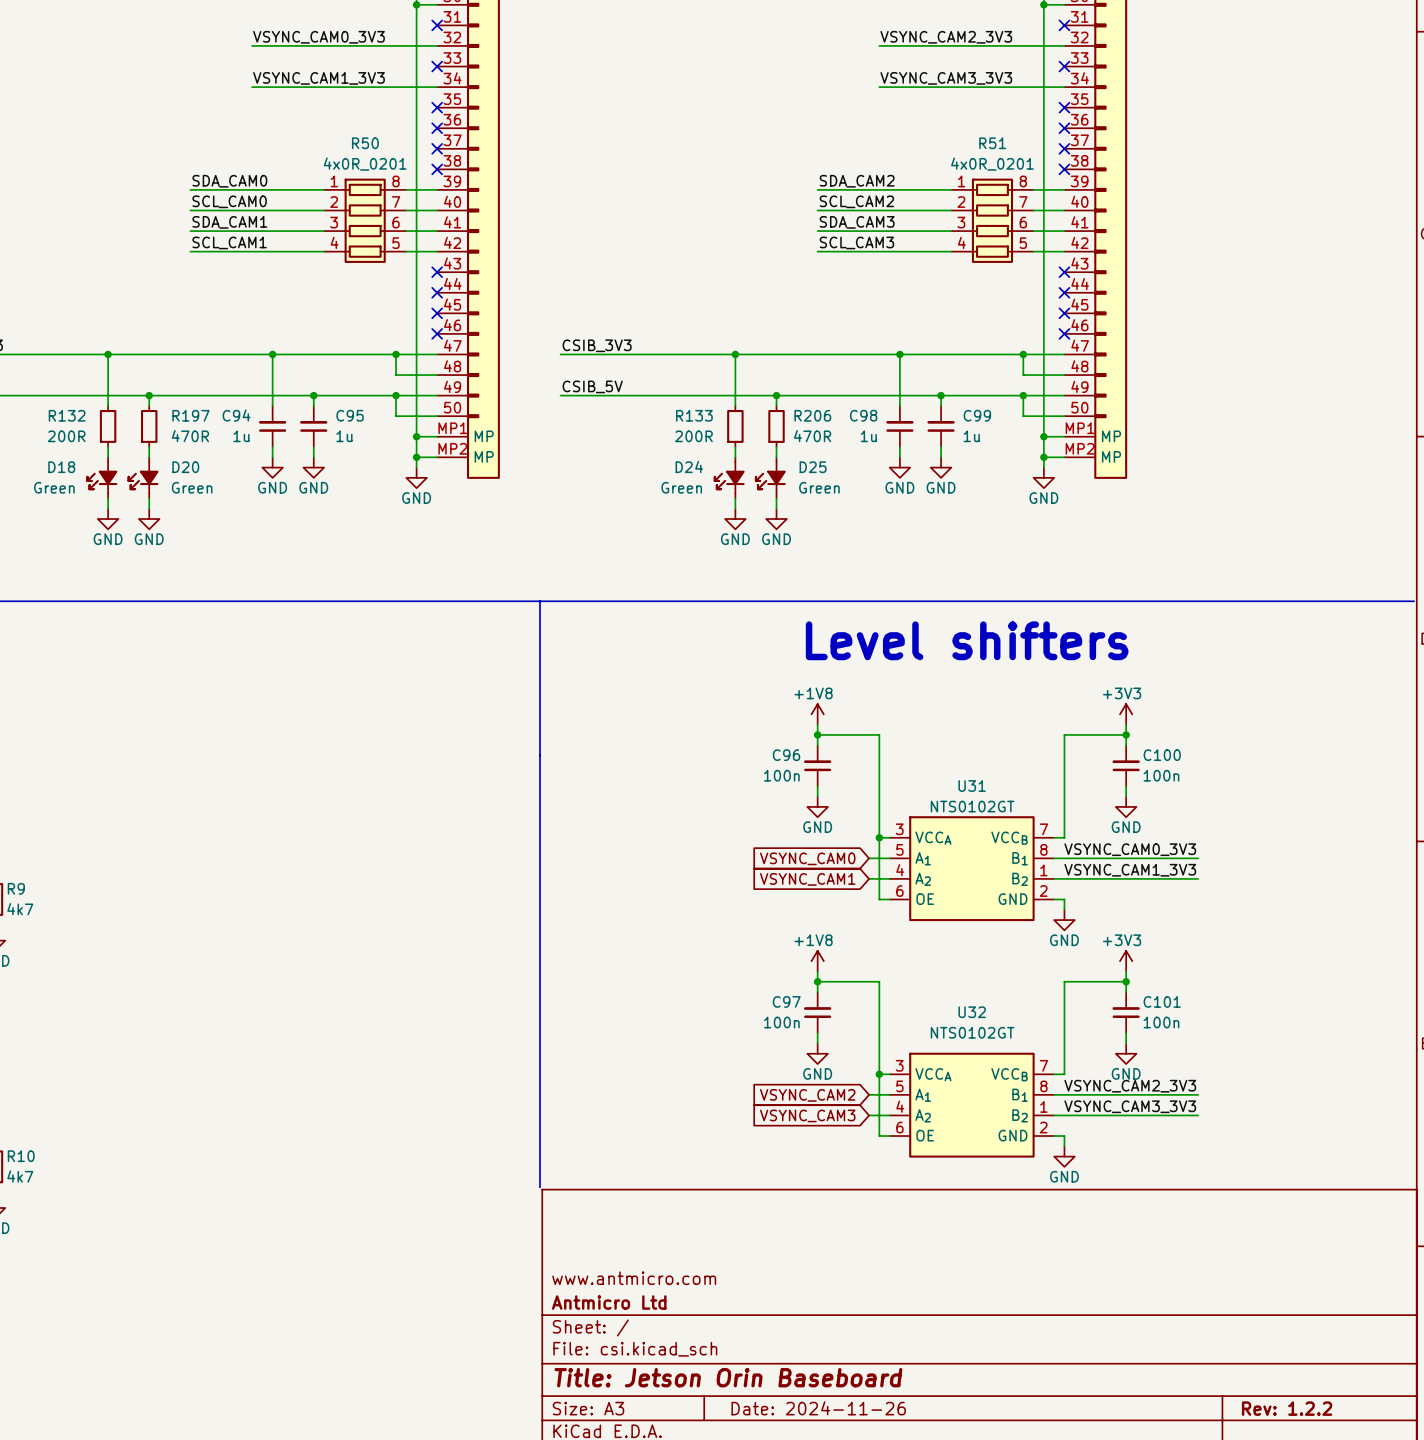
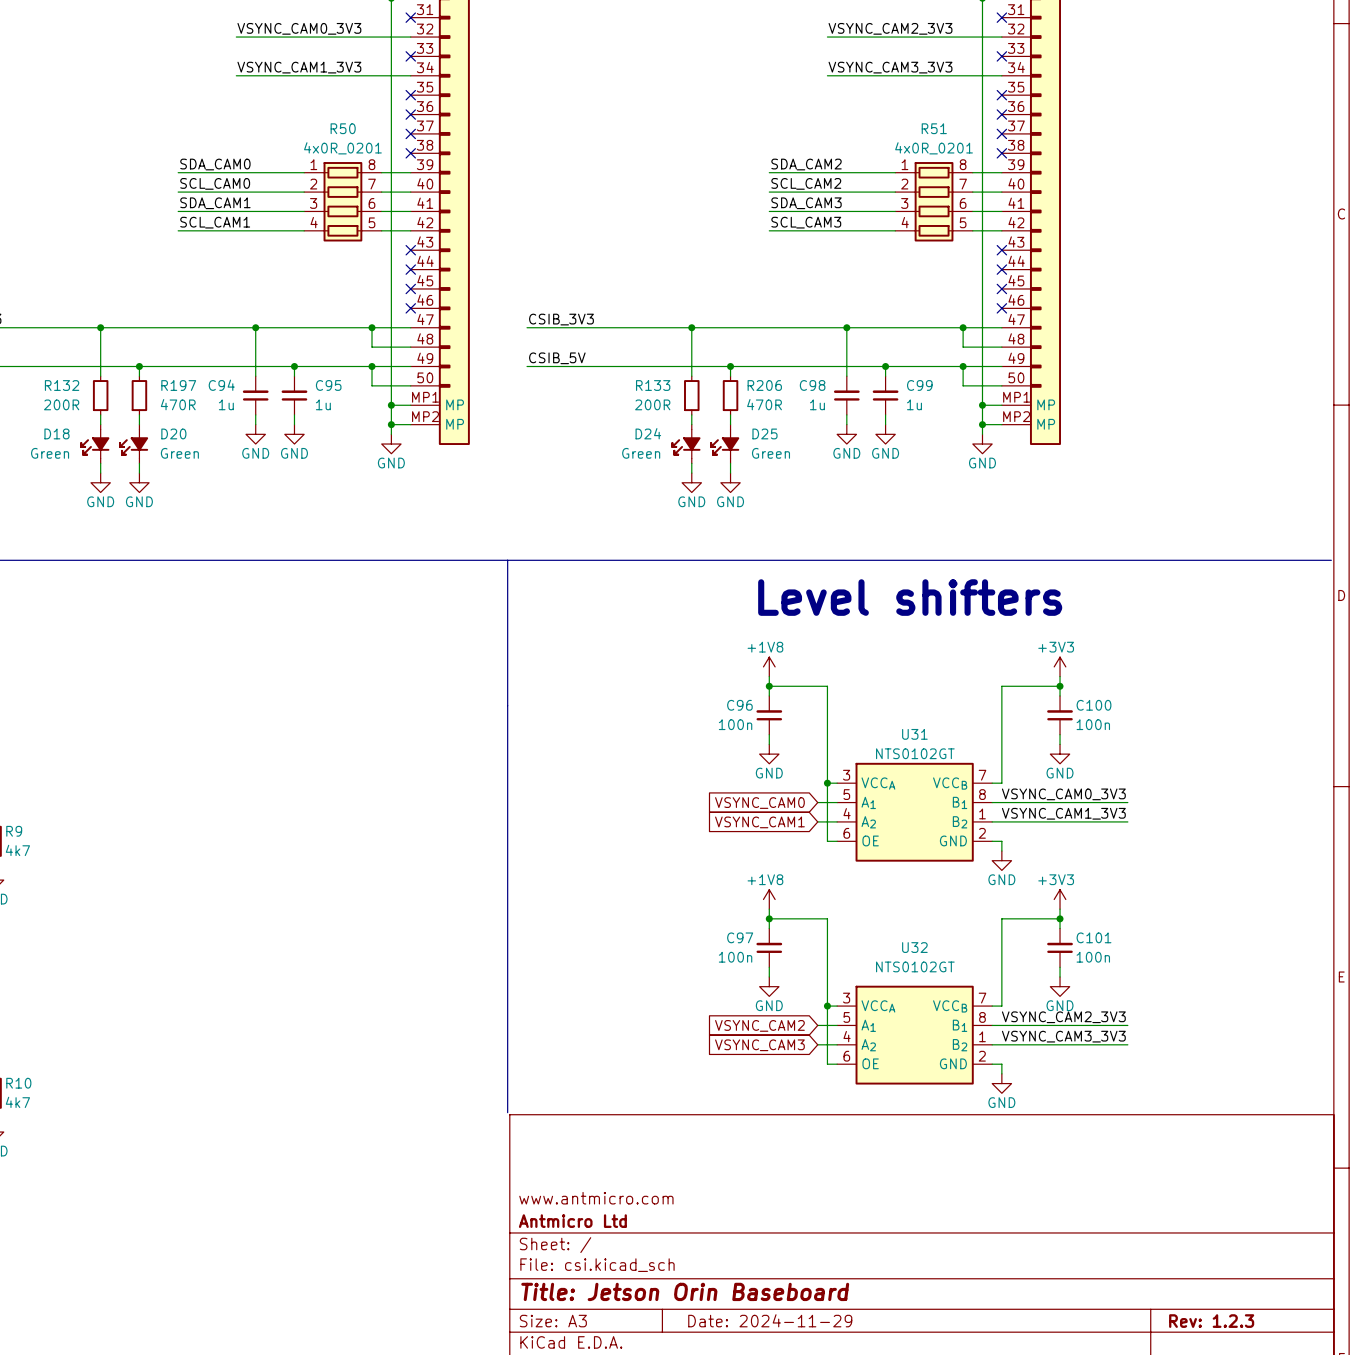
title block: Date: 2024-11-26 (818, 1408) -> Date: 2024-11-29 (770, 1320)
title block: Rev: 1.2.2 (1287, 1408) -> Rev: 1.2.3 (1211, 1321)

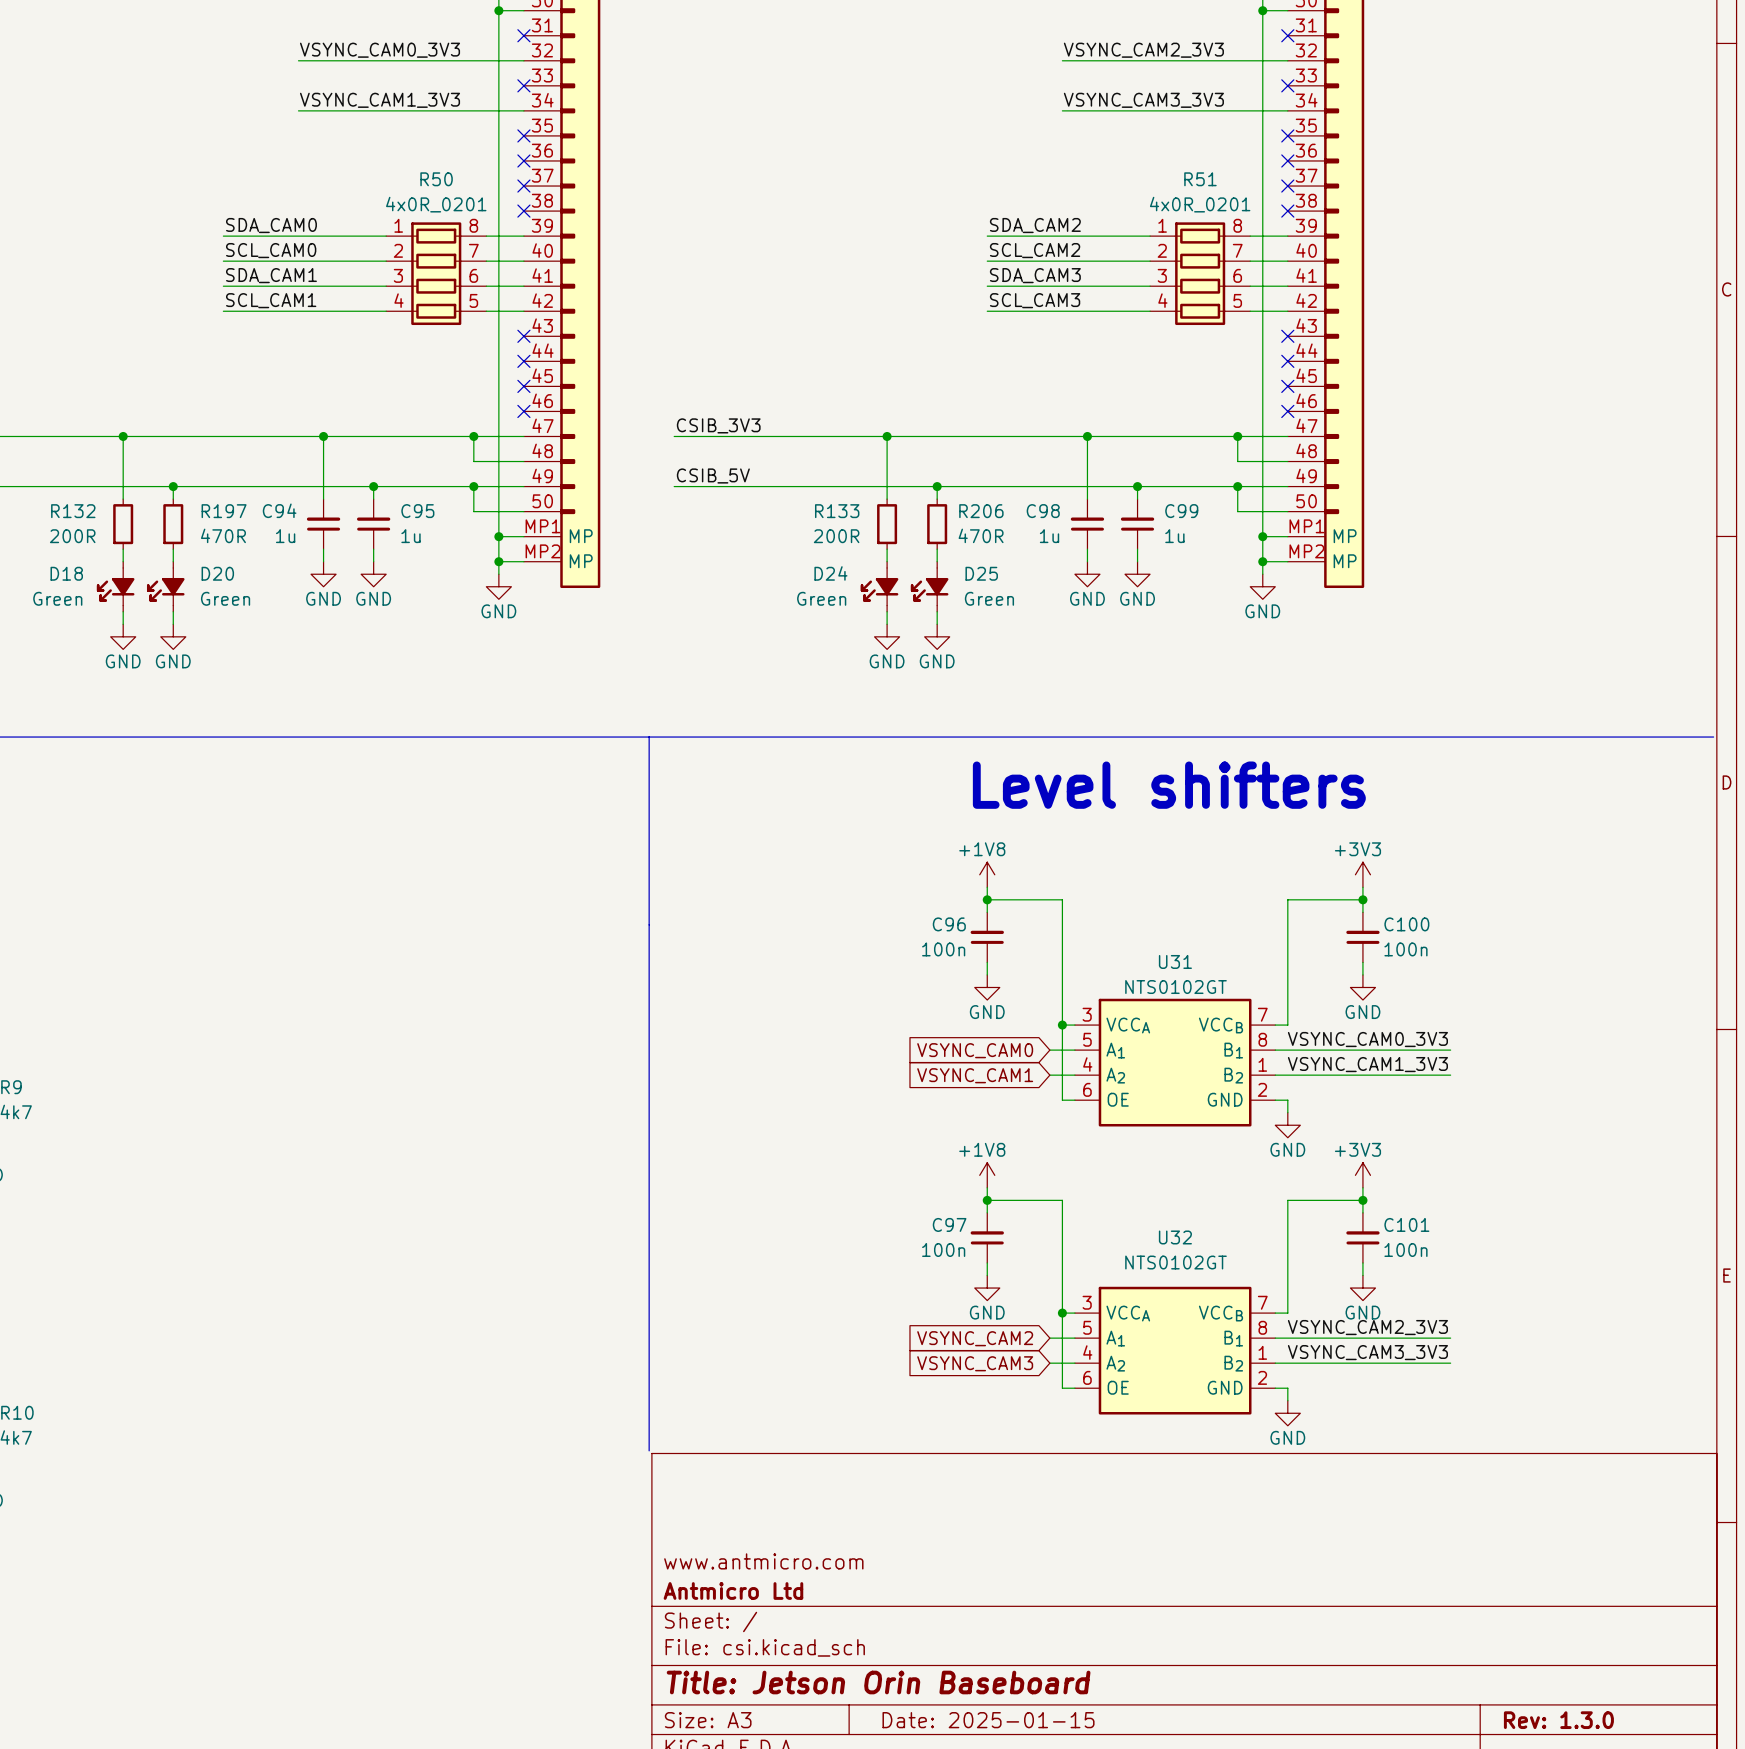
title block: Date: 2024-11-29 (770, 1320) -> Date: 2025-01-15 (988, 1720)
title block: Rev: 1.2.3 (1211, 1321) -> Rev: 1.3.0 (1558, 1720)

